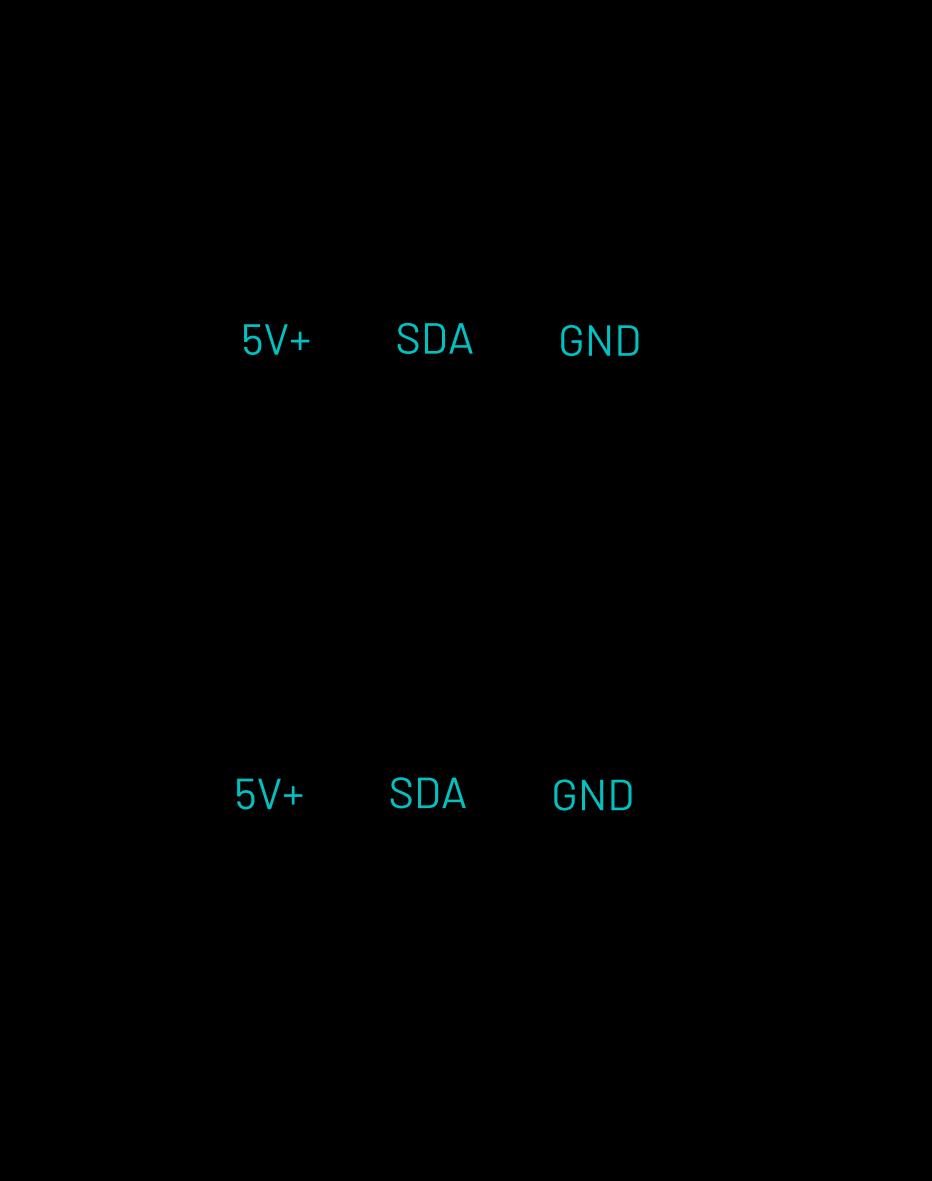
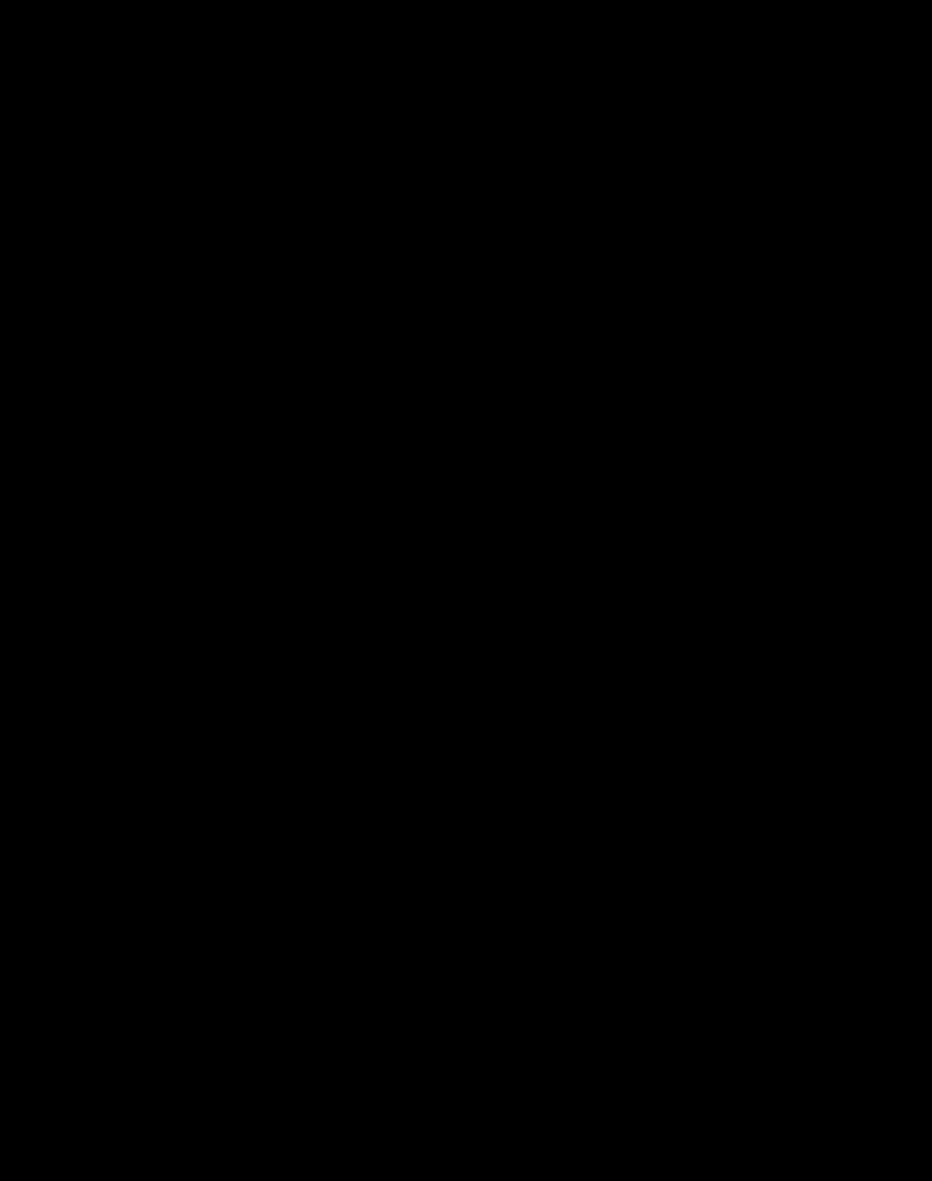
text: SDA (435, 338) -> none
text: 5V+ (276, 339) -> none
text: GND (599, 340) -> none
text: SDA (428, 792) -> none
text: 5V+ (269, 794) -> none
text: GND (592, 794) -> none

